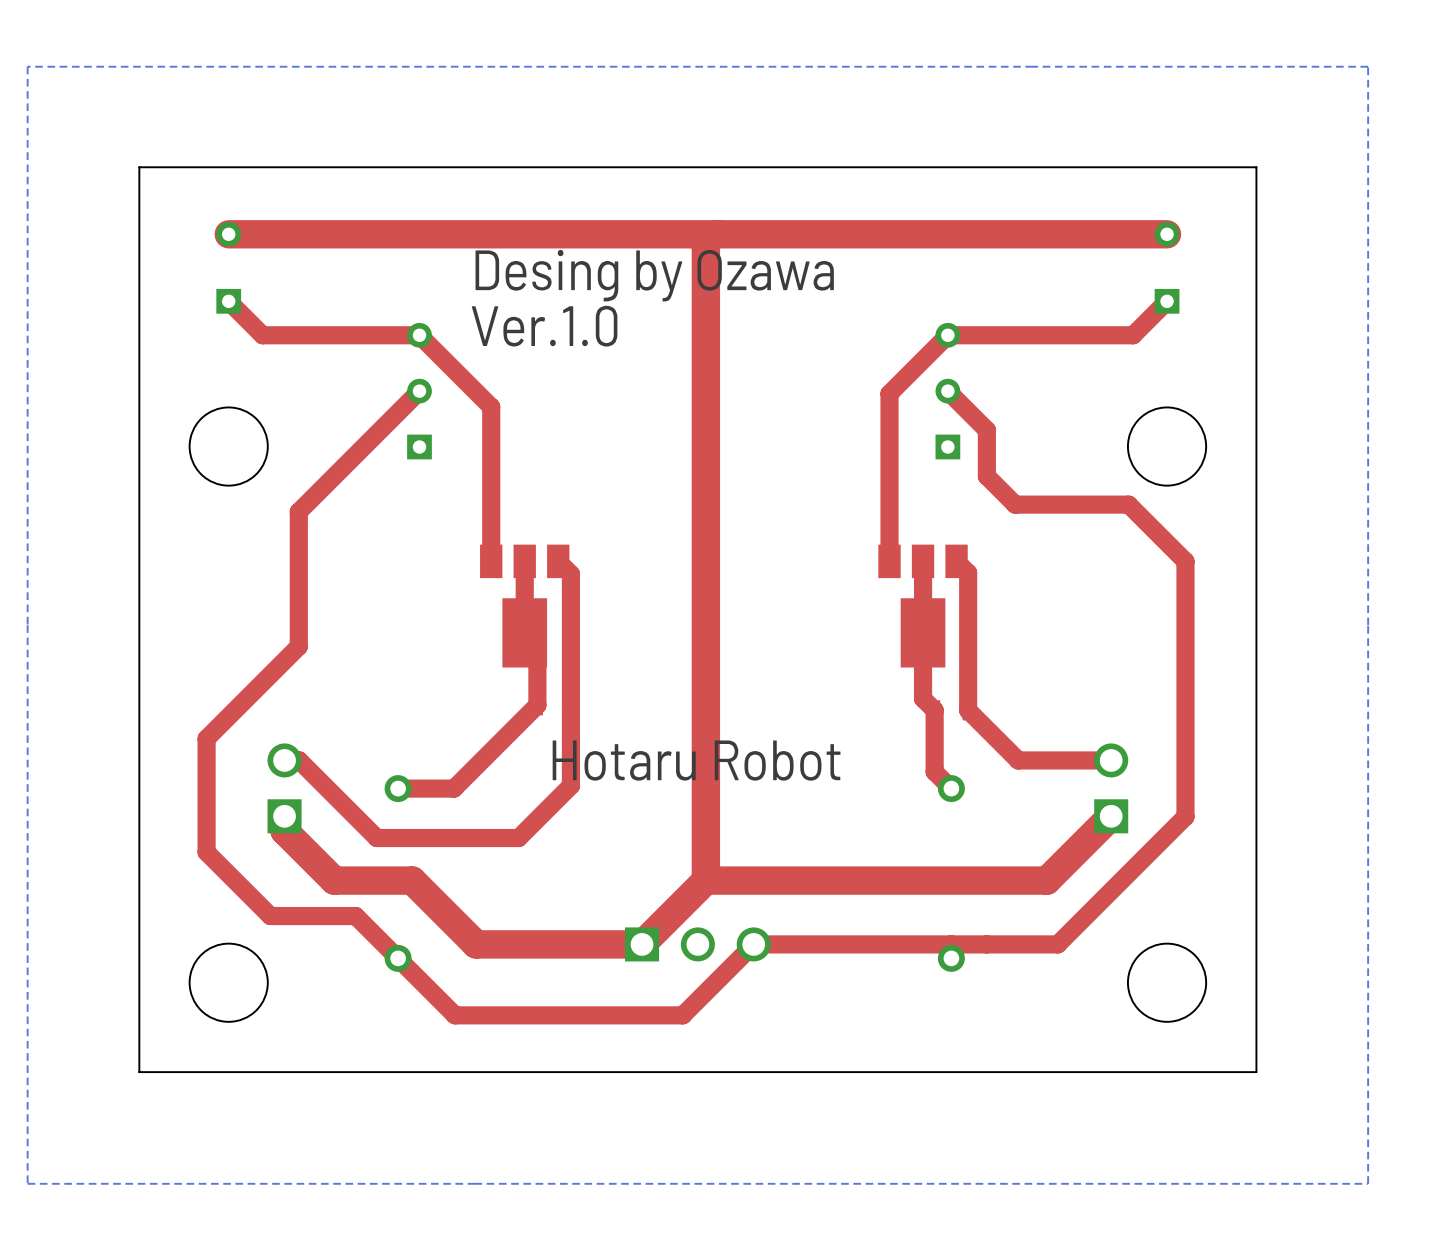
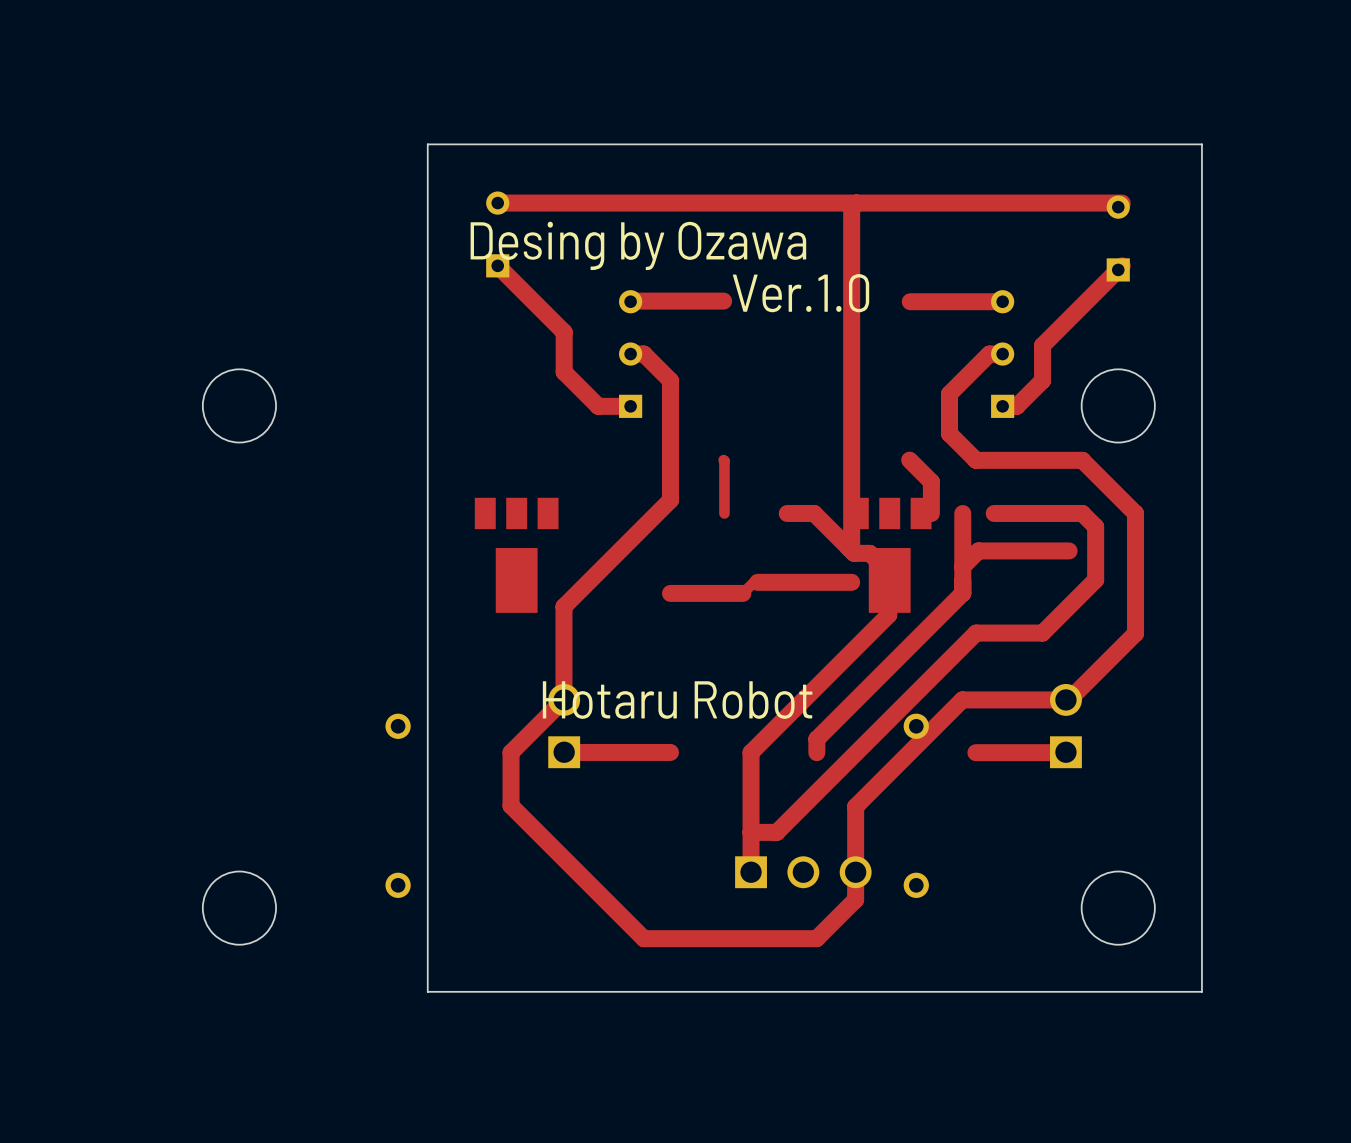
bottom zone outline: (1368, 66) (1368, 1183) (27, 1183) (27, 66) (1368, 66) -> none
board edge: (429, 167) (139, 167) (139, 1072) (429, 1072) -> (427, 144) (427, 991)
top track: none -> (856, 203) (851, 207) (851, 550)
top track: none -> (1122, 203) (497, 203)
top track: (717, 234) (710, 240) (705, 240) (705, 880) -> none
top track: (1167, 234) (228, 234) -> none
part position: (228, 267) -> (497, 234)
top track: none -> (497, 265) (564, 332) (564, 372) (598, 406) (630, 406)
top track: none -> (1122, 265) (1042, 345) (1042, 380) (1016, 406) (1002, 406)
top track: (228, 301) (262, 335) (419, 335) (491, 407) (491, 561) -> none
top track: (1167, 301) (1133, 335) (1043, 335) -> none
text position: Ver.1.0 (544, 326) -> Ver.1.0 (801, 293)
top track: none -> (723, 301) (630, 301)
top track: (947, 335) (889, 393) (889, 561) -> none
top track: (419, 391) (298, 511) (298, 646) (206, 738) (206, 852) (270, 916) (355, 916) (455, 1015) (660, 1015) -> (630, 354) (643, 354) (670, 380) (670, 500) (563, 606) (563, 699) (511, 752) (511, 805) (643, 938)
part: (419, 391) -> none
part: none -> (630, 354)
top track: (947, 391) (986, 430) (986, 433) -> (1002, 354) (989, 354) (949, 393)
part position: (947, 391) -> (1002, 354)
top track: none -> (723, 460) (724, 513)
top track: none -> (909, 460) (931, 481) (931, 513)
top track: (524, 561) (524, 632) (537, 645) (537, 705) (454, 788) (398, 788) -> none
top track: (558, 561) (570, 574) (570, 785) (518, 838) (376, 838) (299, 760) (284, 760) -> none
top track: none -> (787, 513) (814, 513) (854, 553) (869, 553) (888, 572) (888, 614) (751, 752)
top track: (923, 561) (923, 698) (934, 710) (934, 771) (951, 788) -> none
top track: (956, 561) (968, 572) (968, 710) (1018, 760) -> none
top track: none -> (962, 513) (962, 593) (816, 739) (816, 752)
top track: none -> (994, 513) (1082, 513) (1095, 526) (1095, 579) (1042, 633) (976, 633) (776, 832) (751, 832)
top track: none -> (1069, 550) (978, 550) (962, 566)
top track: none -> (851, 582) (757, 582) (755, 580) (742, 593) (670, 593)
top track: (1185, 689) (1185, 816) (1057, 944) (753, 944) (682, 1015) -> (978, 699) (962, 699) (855, 806) (855, 899) (816, 938) (664, 938)
top track: none -> (1135, 633) (1069, 699) (1065, 699)
part position: (284, 788) -> (564, 726)
top track: (284, 816) (284, 830) (334, 880) (412, 880) (476, 944) (642, 944) (705, 880) -> none
top track: none -> (670, 752) (564, 752)
top track: none -> (751, 752) (751, 872)
top track: (1111, 816) (1046, 880) (705, 880) -> none
top track: none -> (1069, 752) (975, 752)
part position: (697, 944) -> (803, 872)

